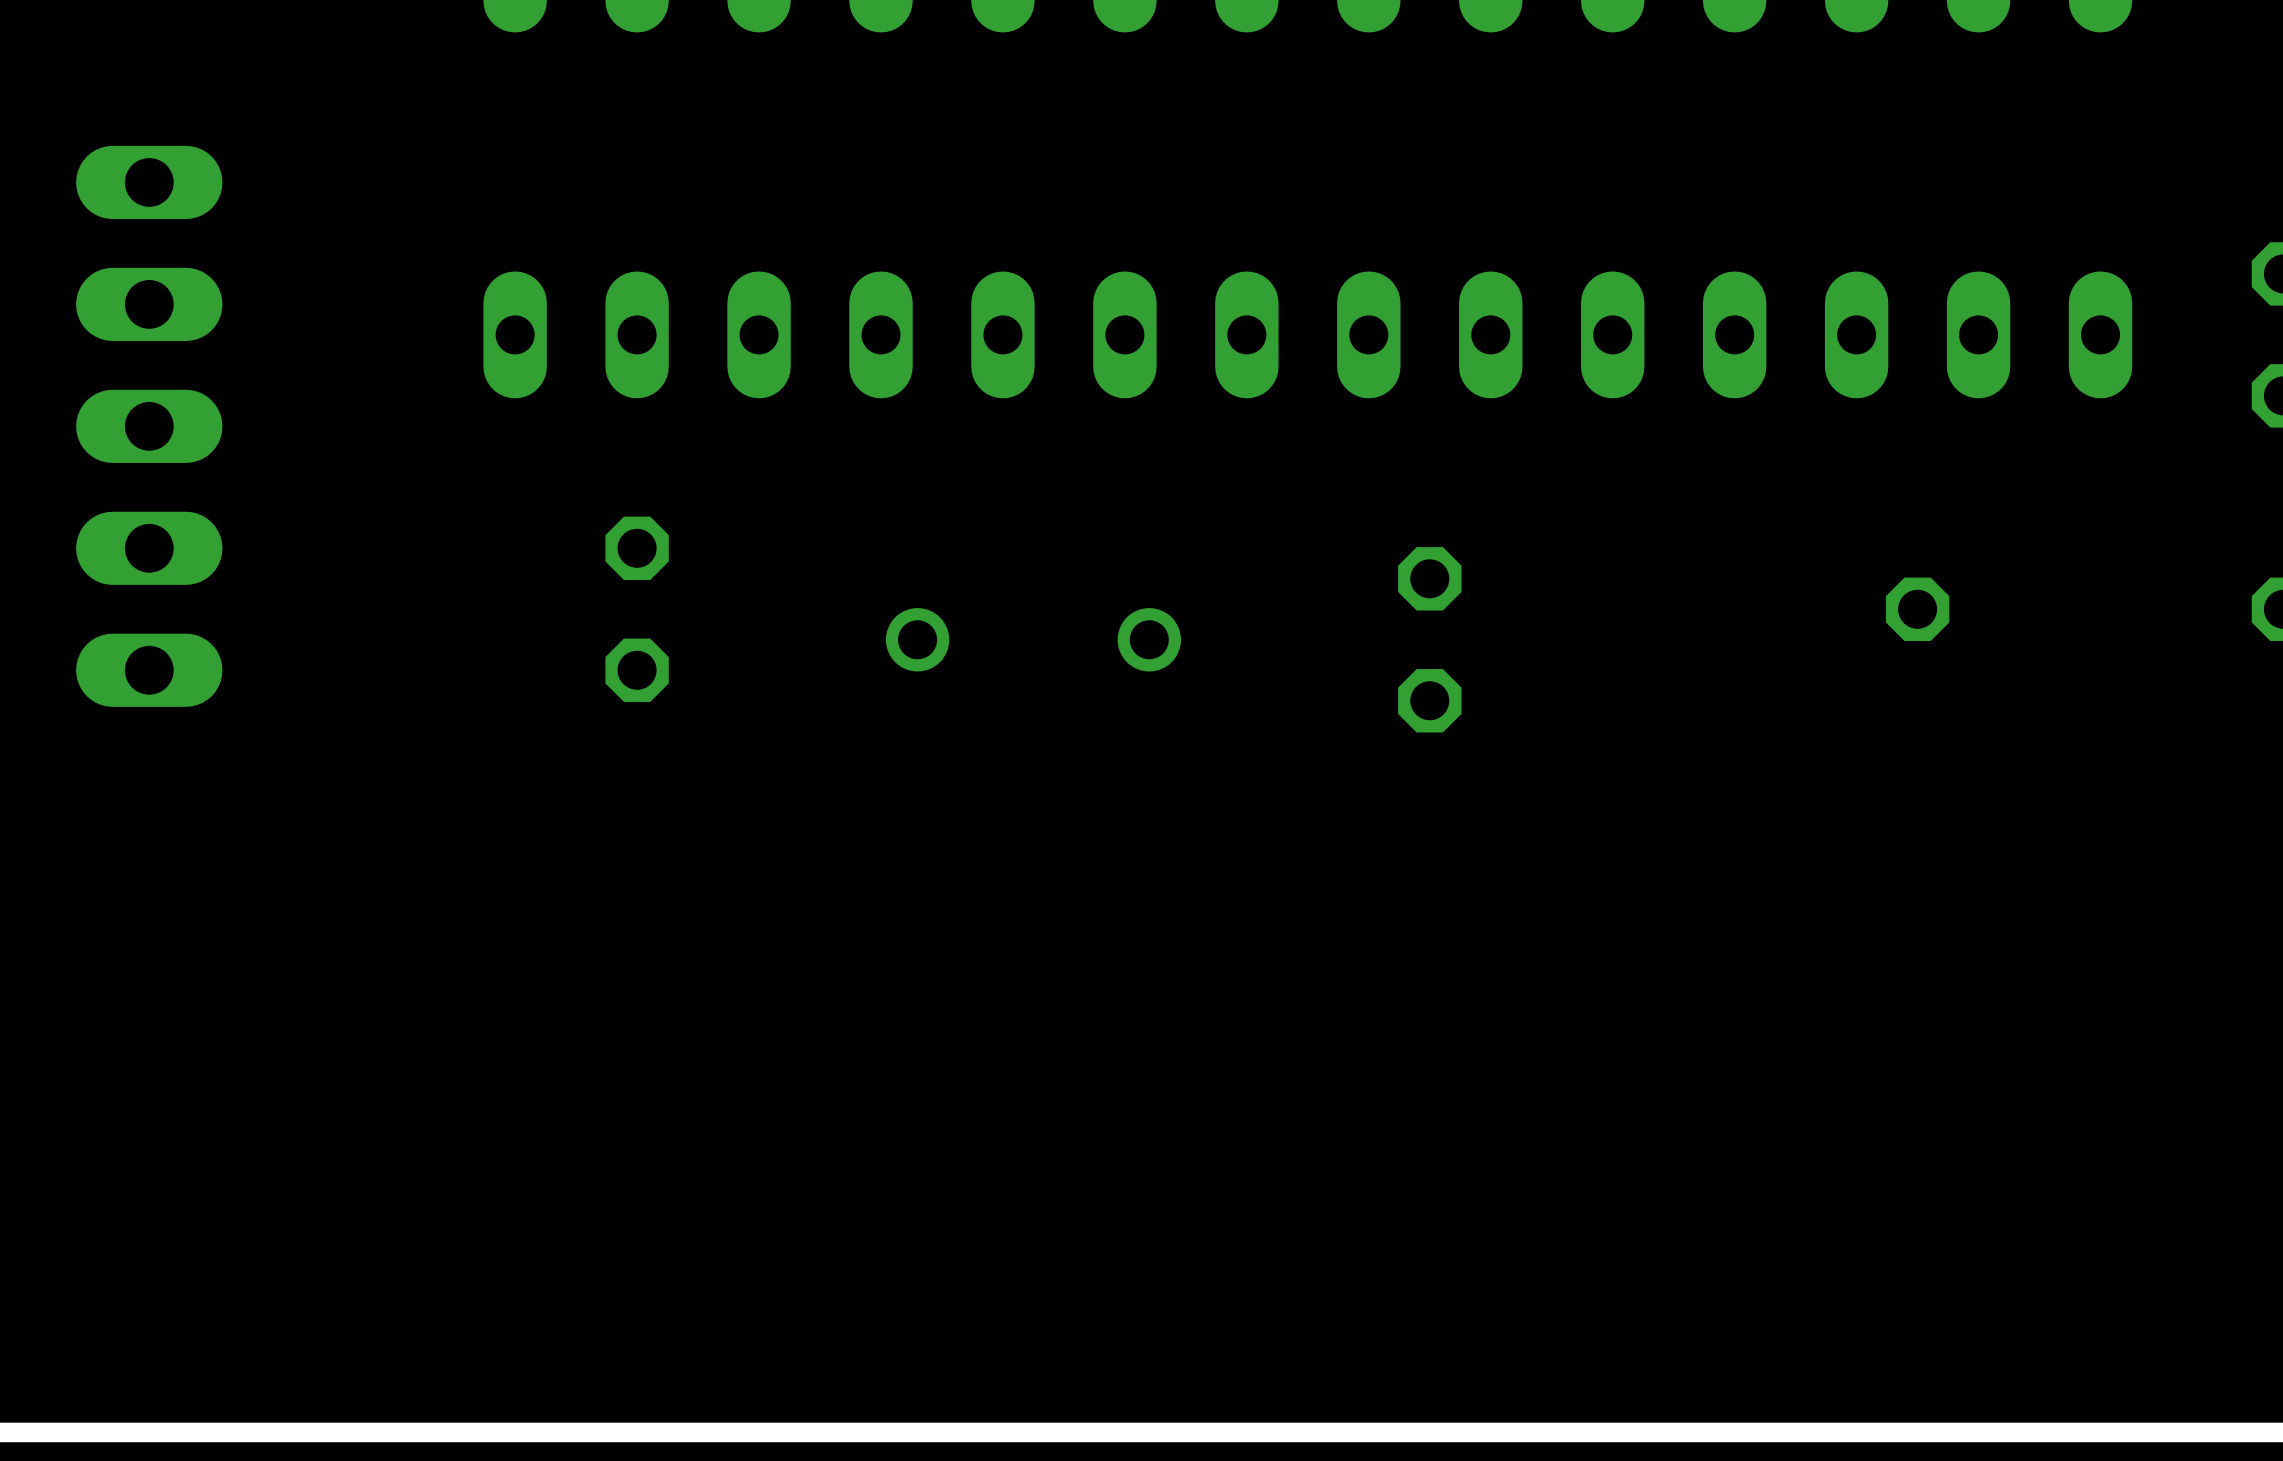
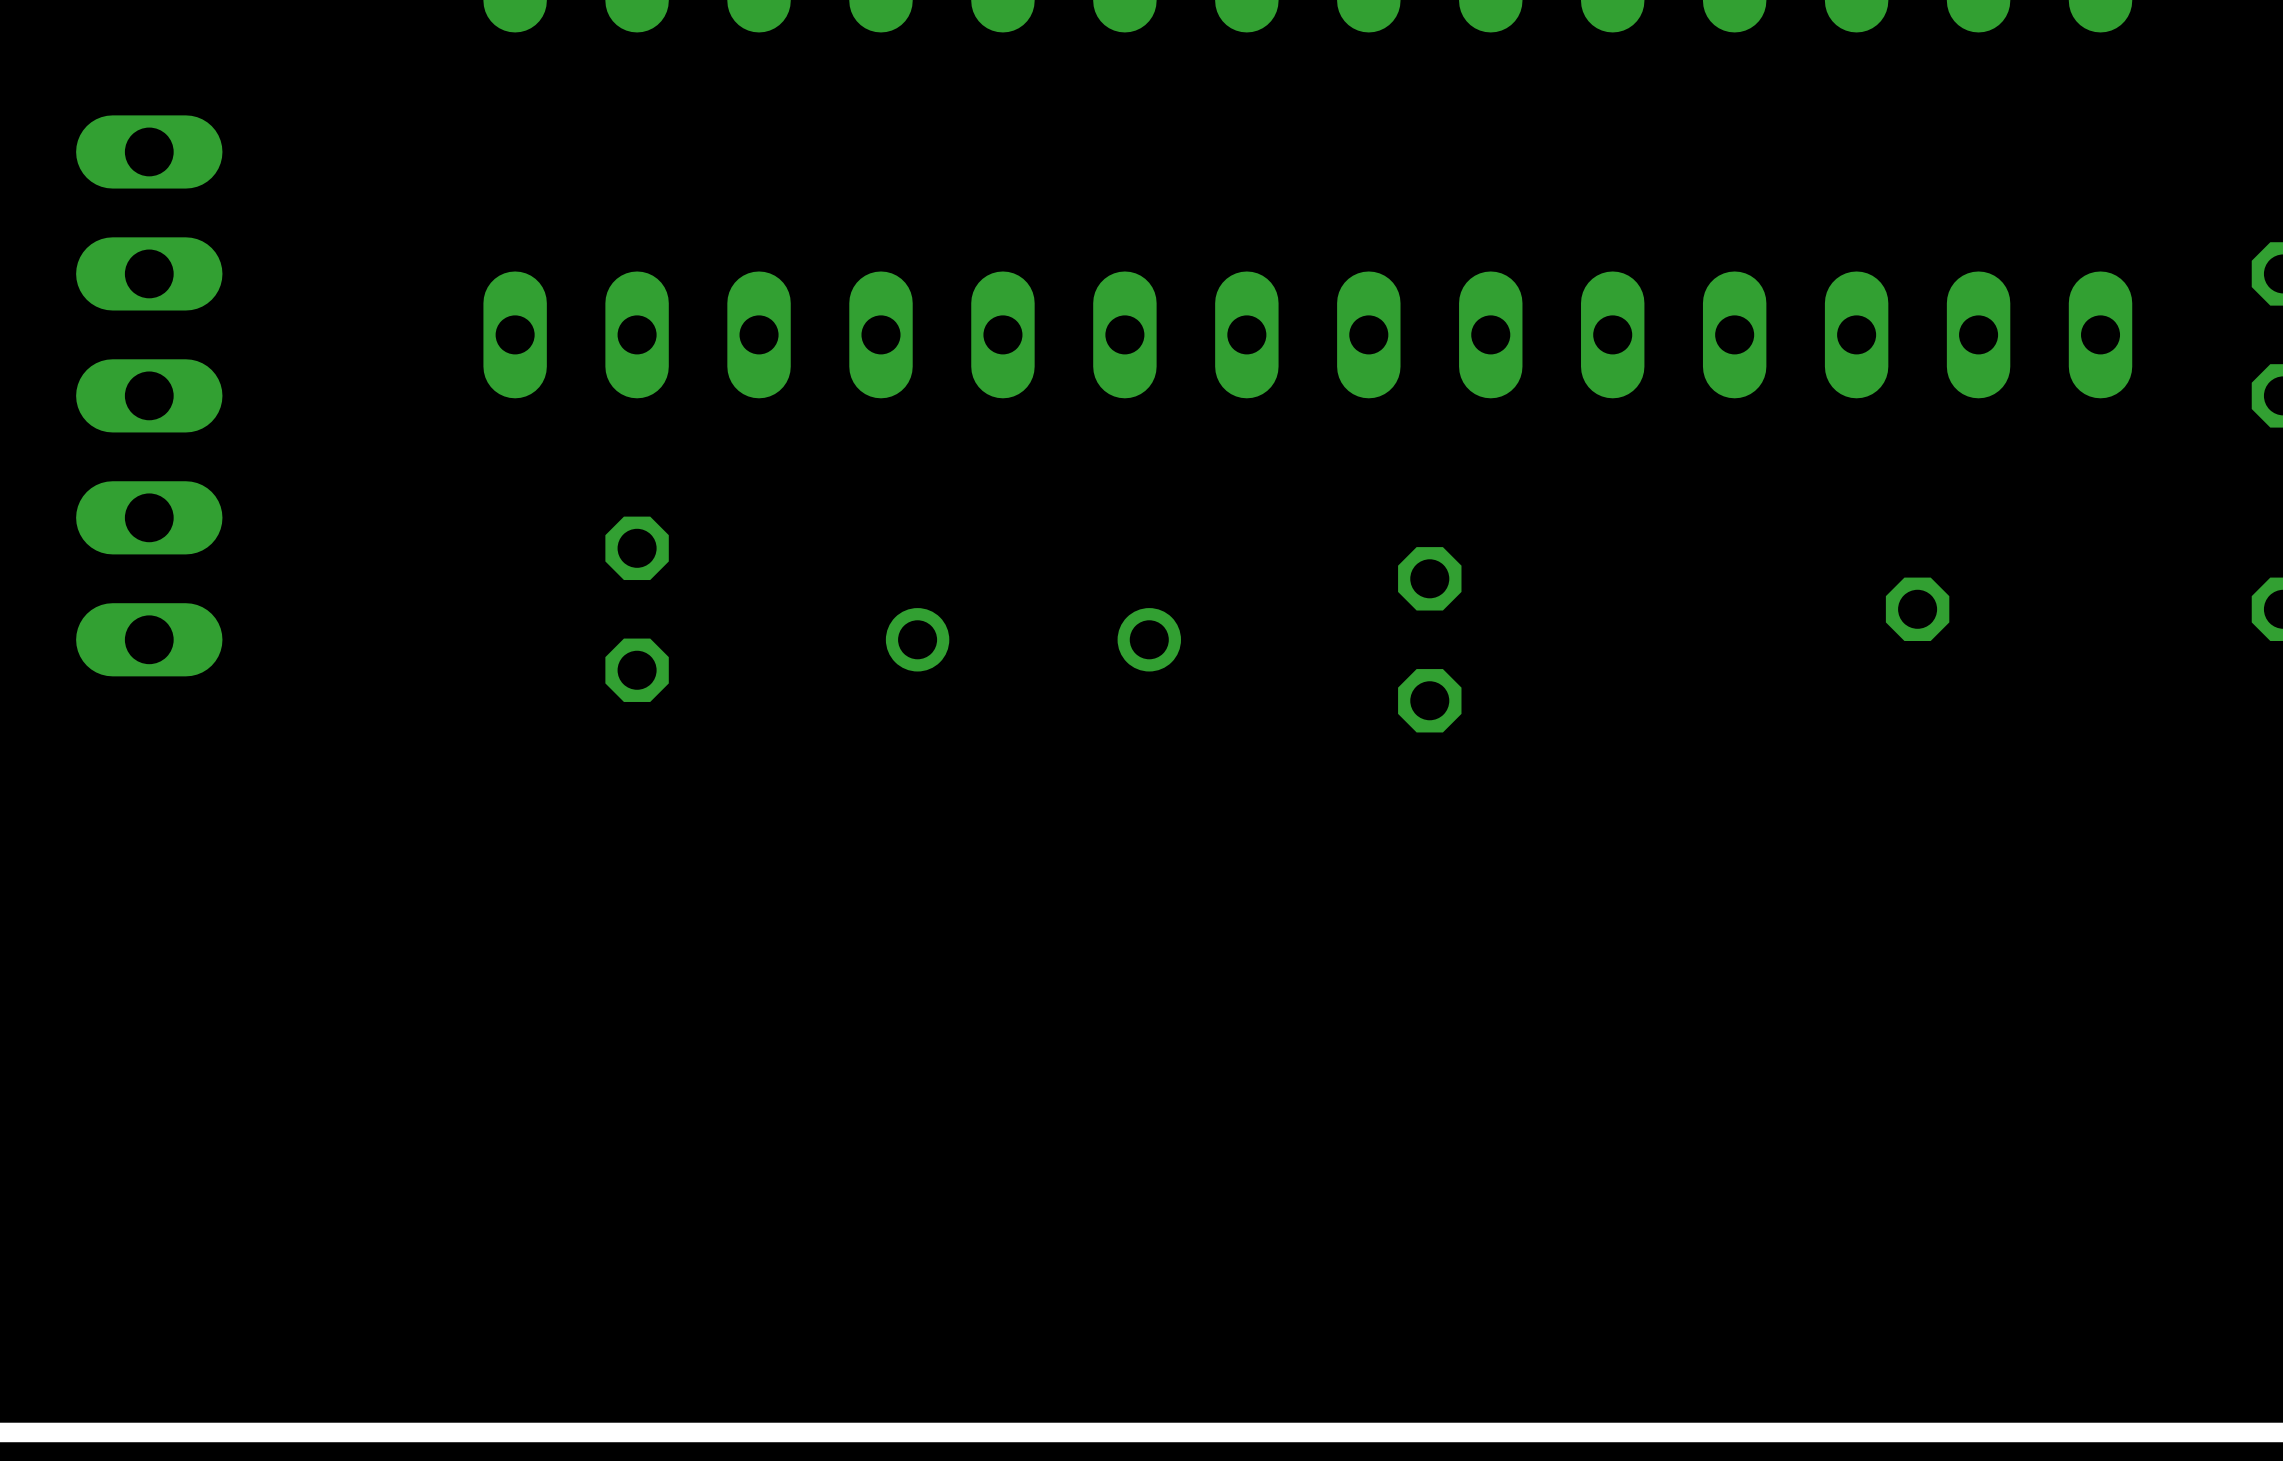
part position: (149, 426) -> (149, 395)

